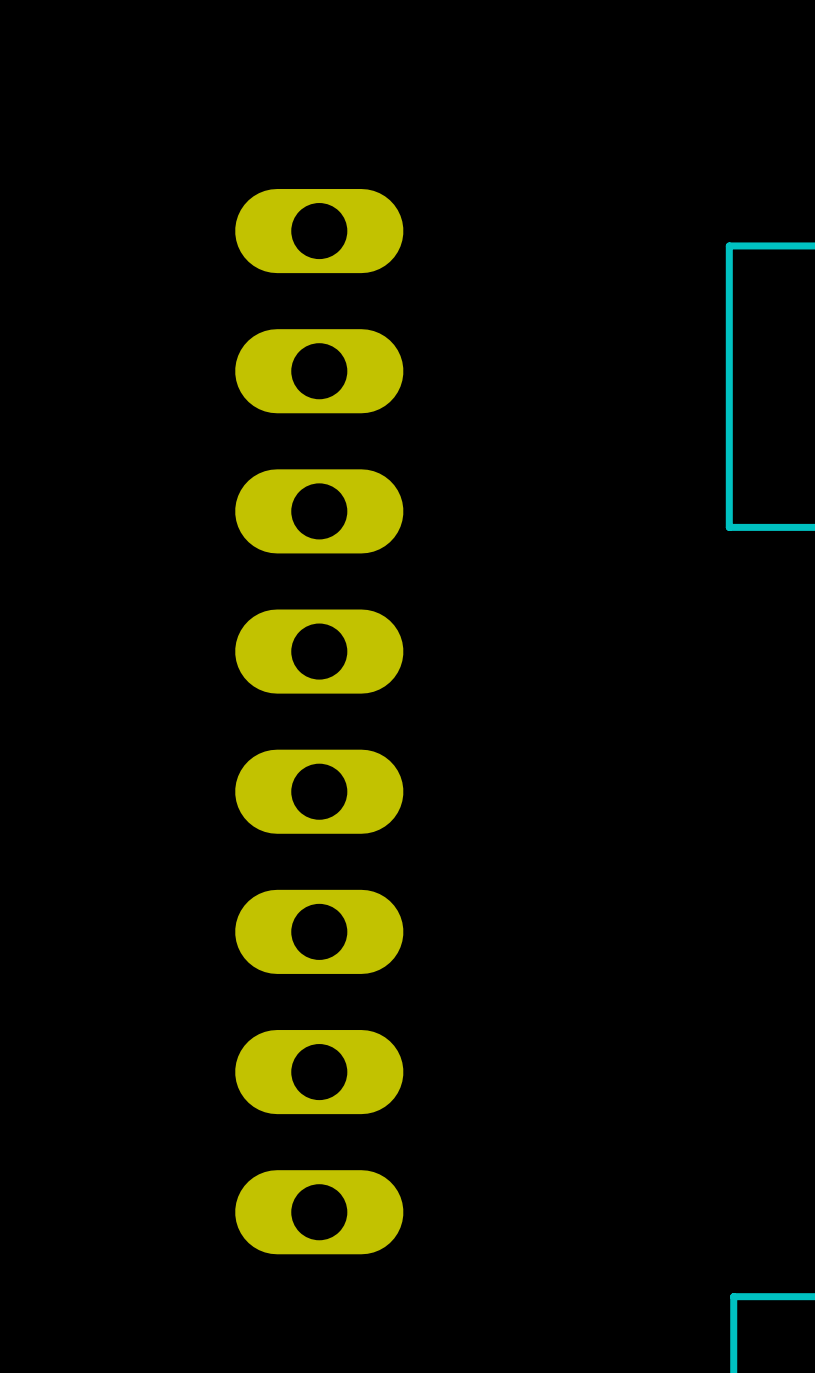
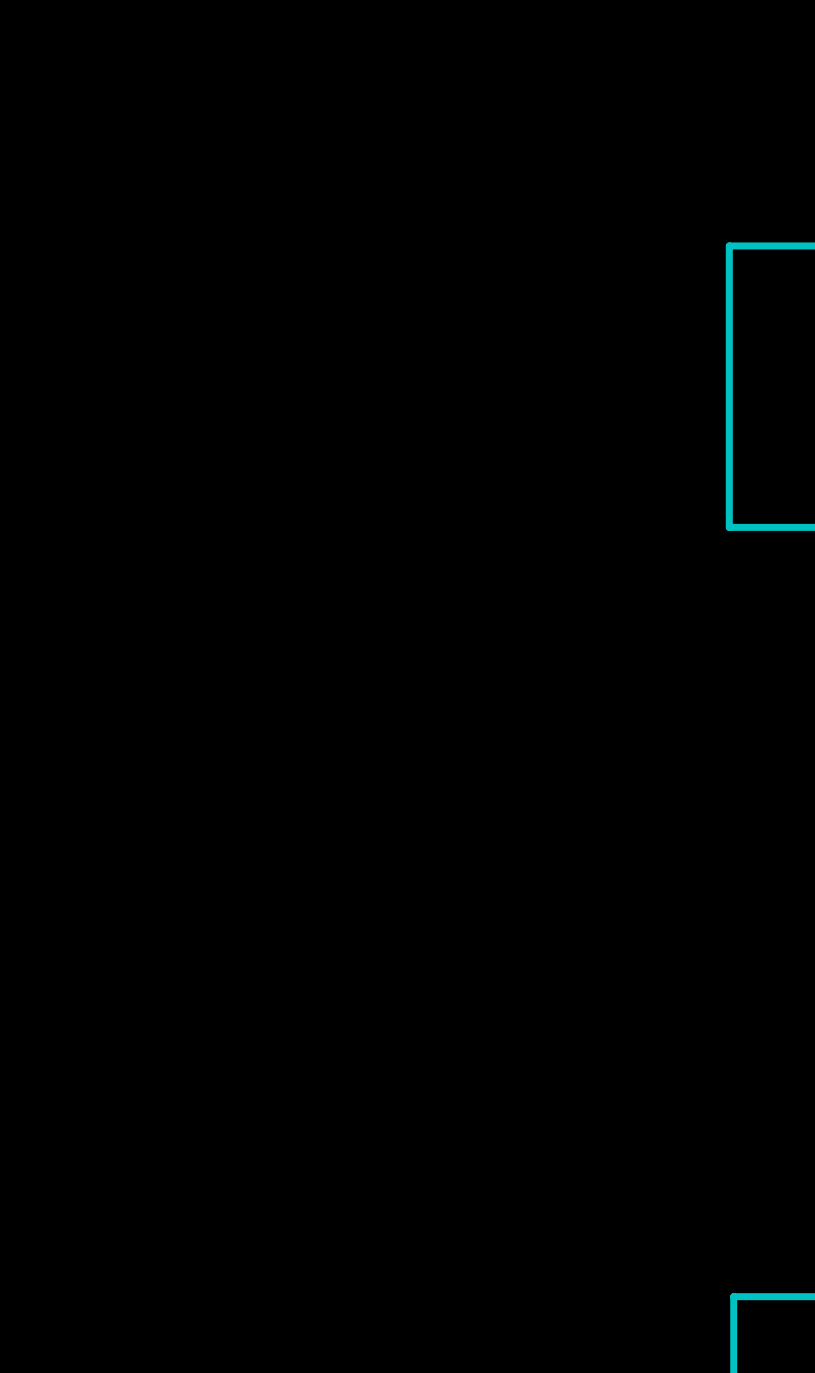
part: (319, 721) -> none

